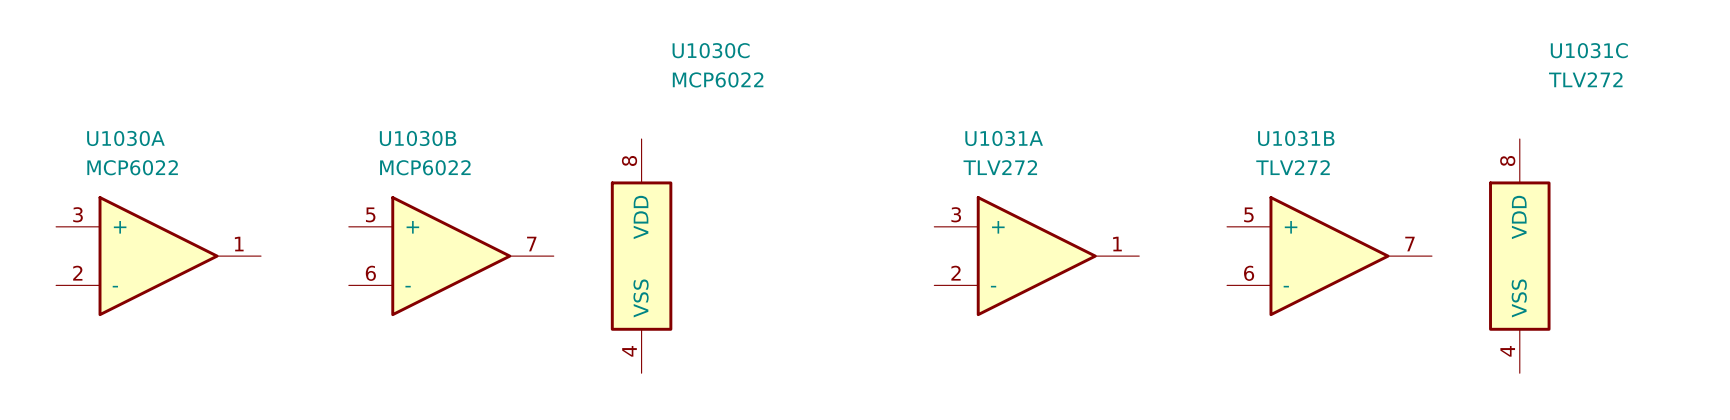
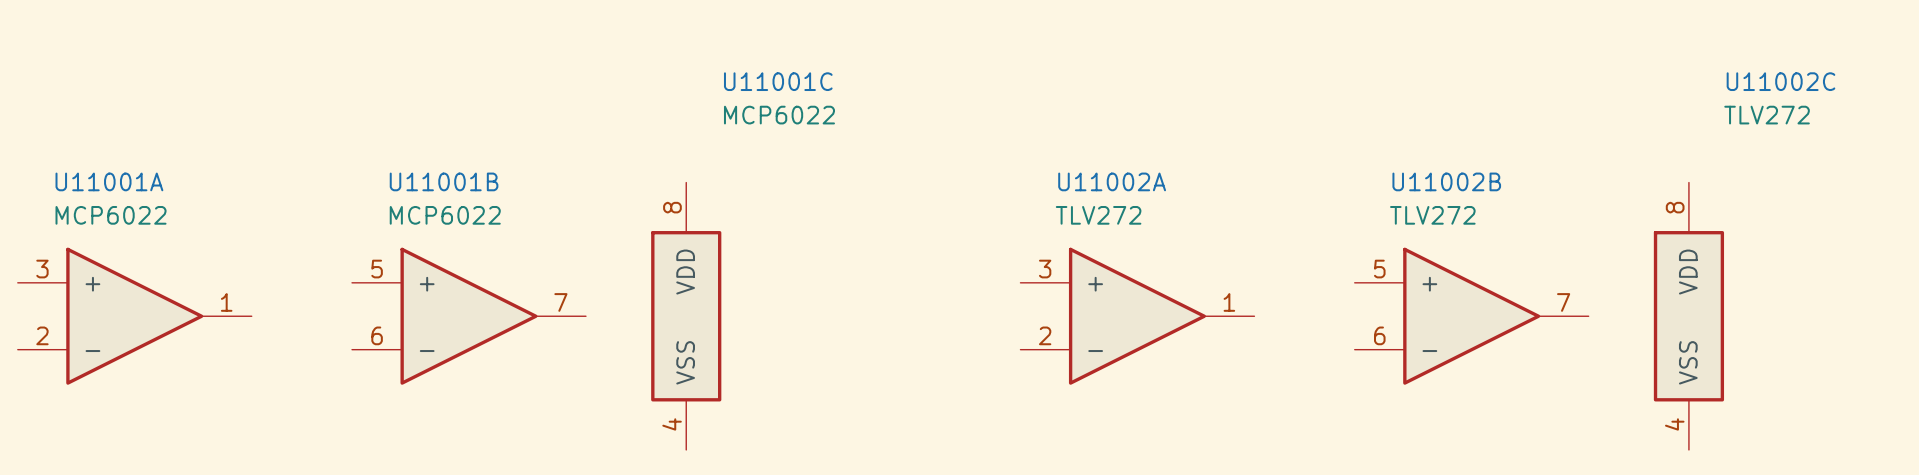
U1030C name: U1030C (711, 50) -> U11001C (778, 81)
U1031C name: U1031C (1589, 50) -> U11002C (1780, 81)
U1030A name: U1030A (125, 138) -> U11001A (109, 181)
U1030B name: U1030B (418, 138) -> U11001B (444, 181)
U1031A name: U1031A (1004, 138) -> U11002A (1112, 181)
U1031B name: U1031B (1296, 138) -> U11002B (1446, 181)

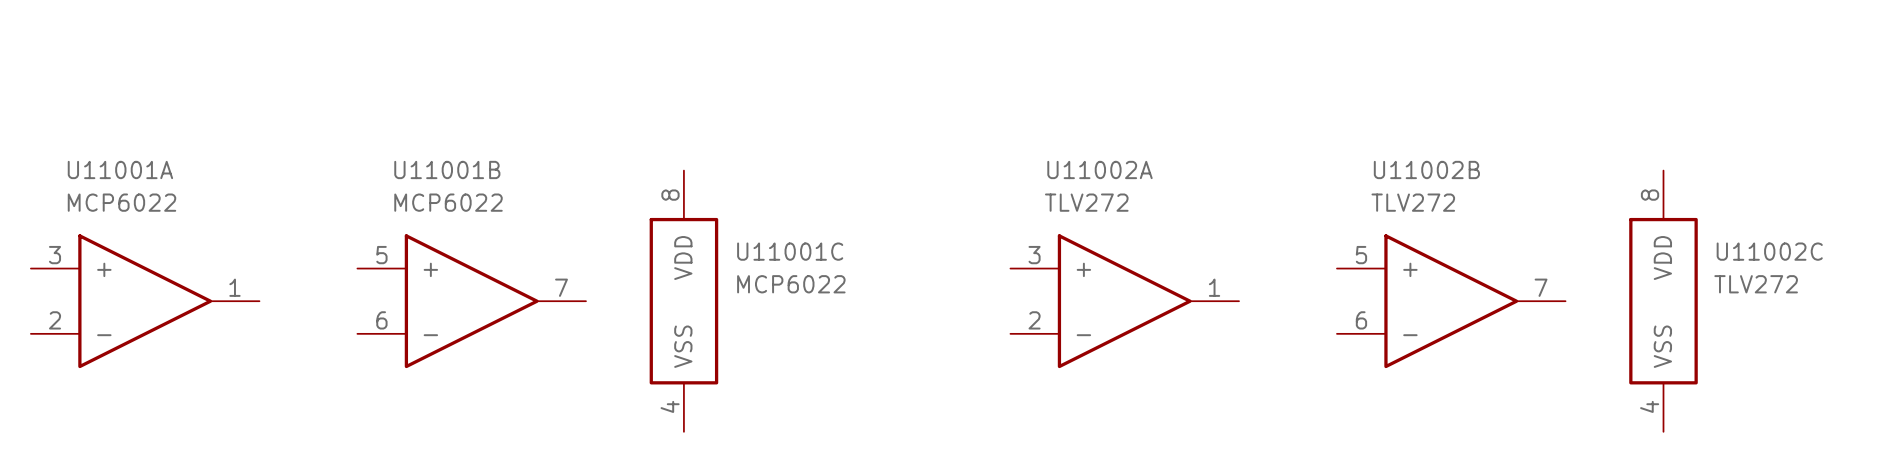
U11001C name position: U11001C (778, 81) -> U11001C (790, 251)
U11002C name position: U11002C (1780, 81) -> U11002C (1769, 251)
U11001C value position: MCP6022 (779, 115) -> MCP6022 (791, 284)
U11002C value position: TLV272 (1767, 115) -> TLV272 (1756, 284)

